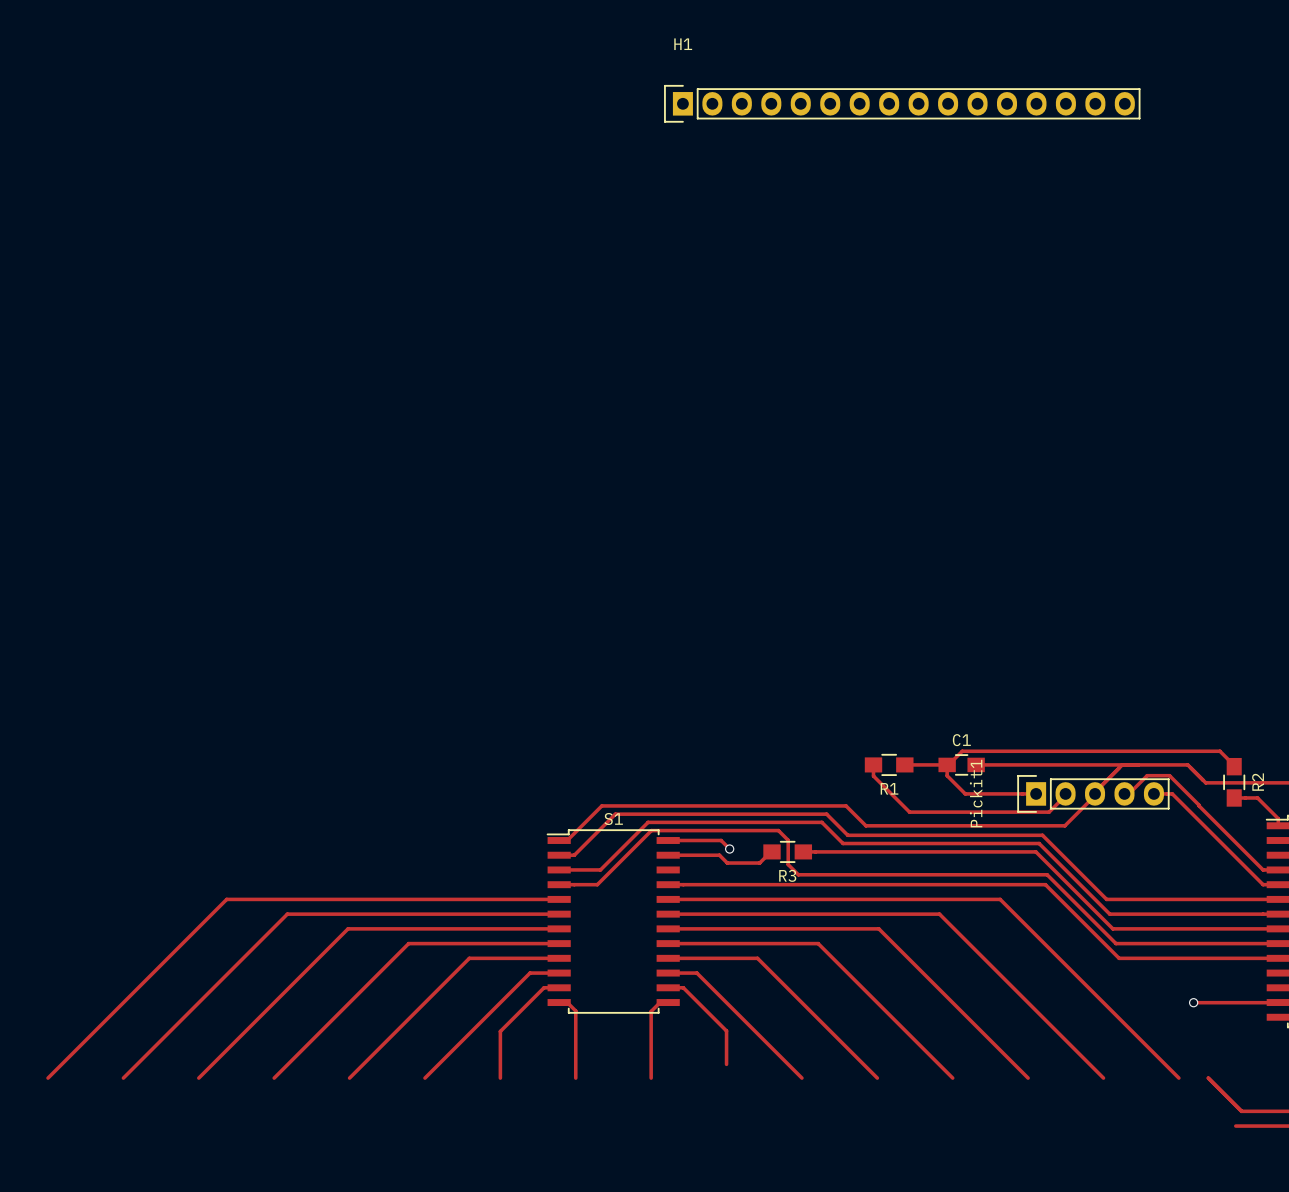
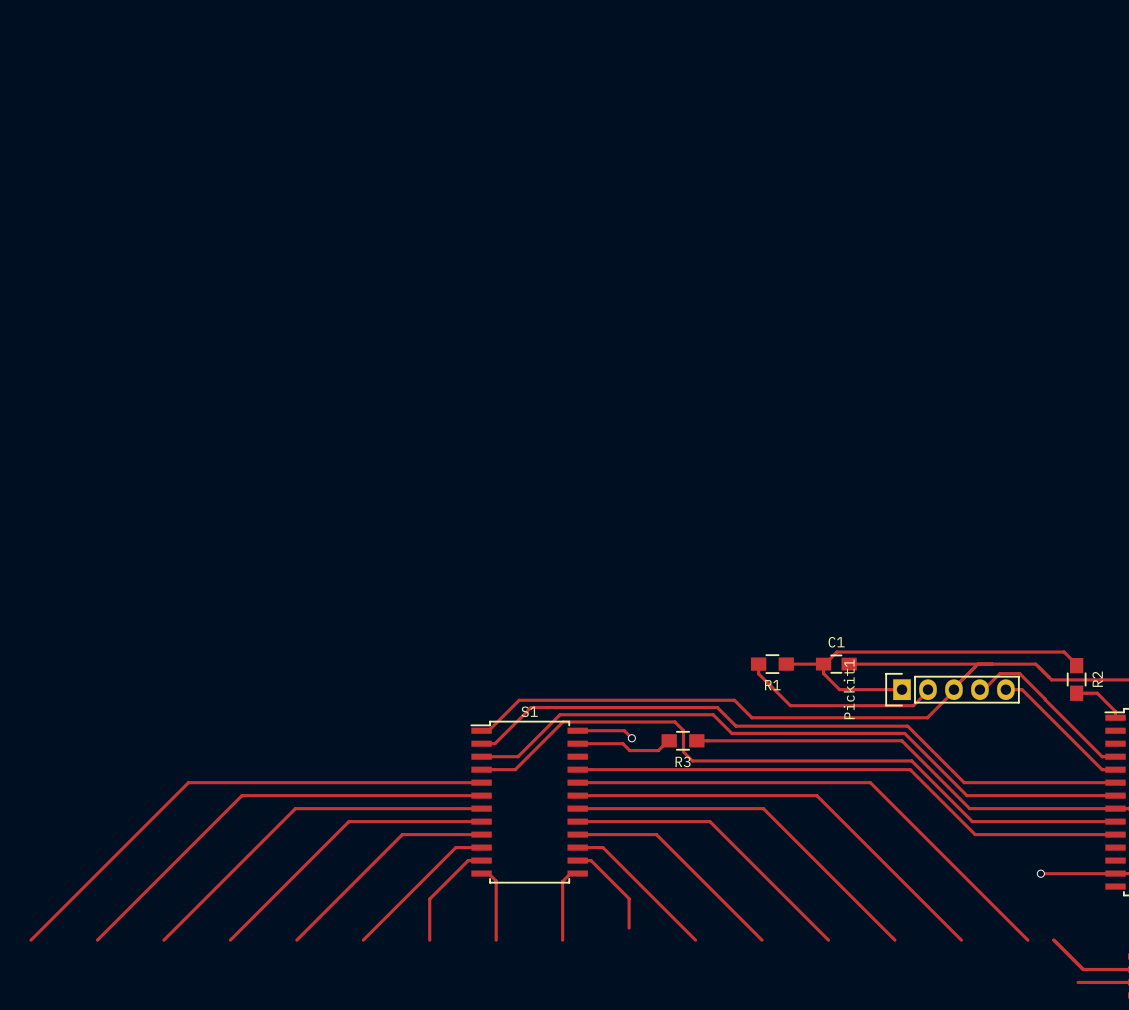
H1: (902, 103) -> none

